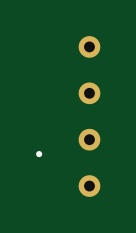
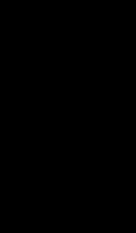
part: (89, 46) -> none
part: (89, 93) -> none
part: (89, 139) -> none
part: (39, 154) -> none
part: (89, 186) -> none

